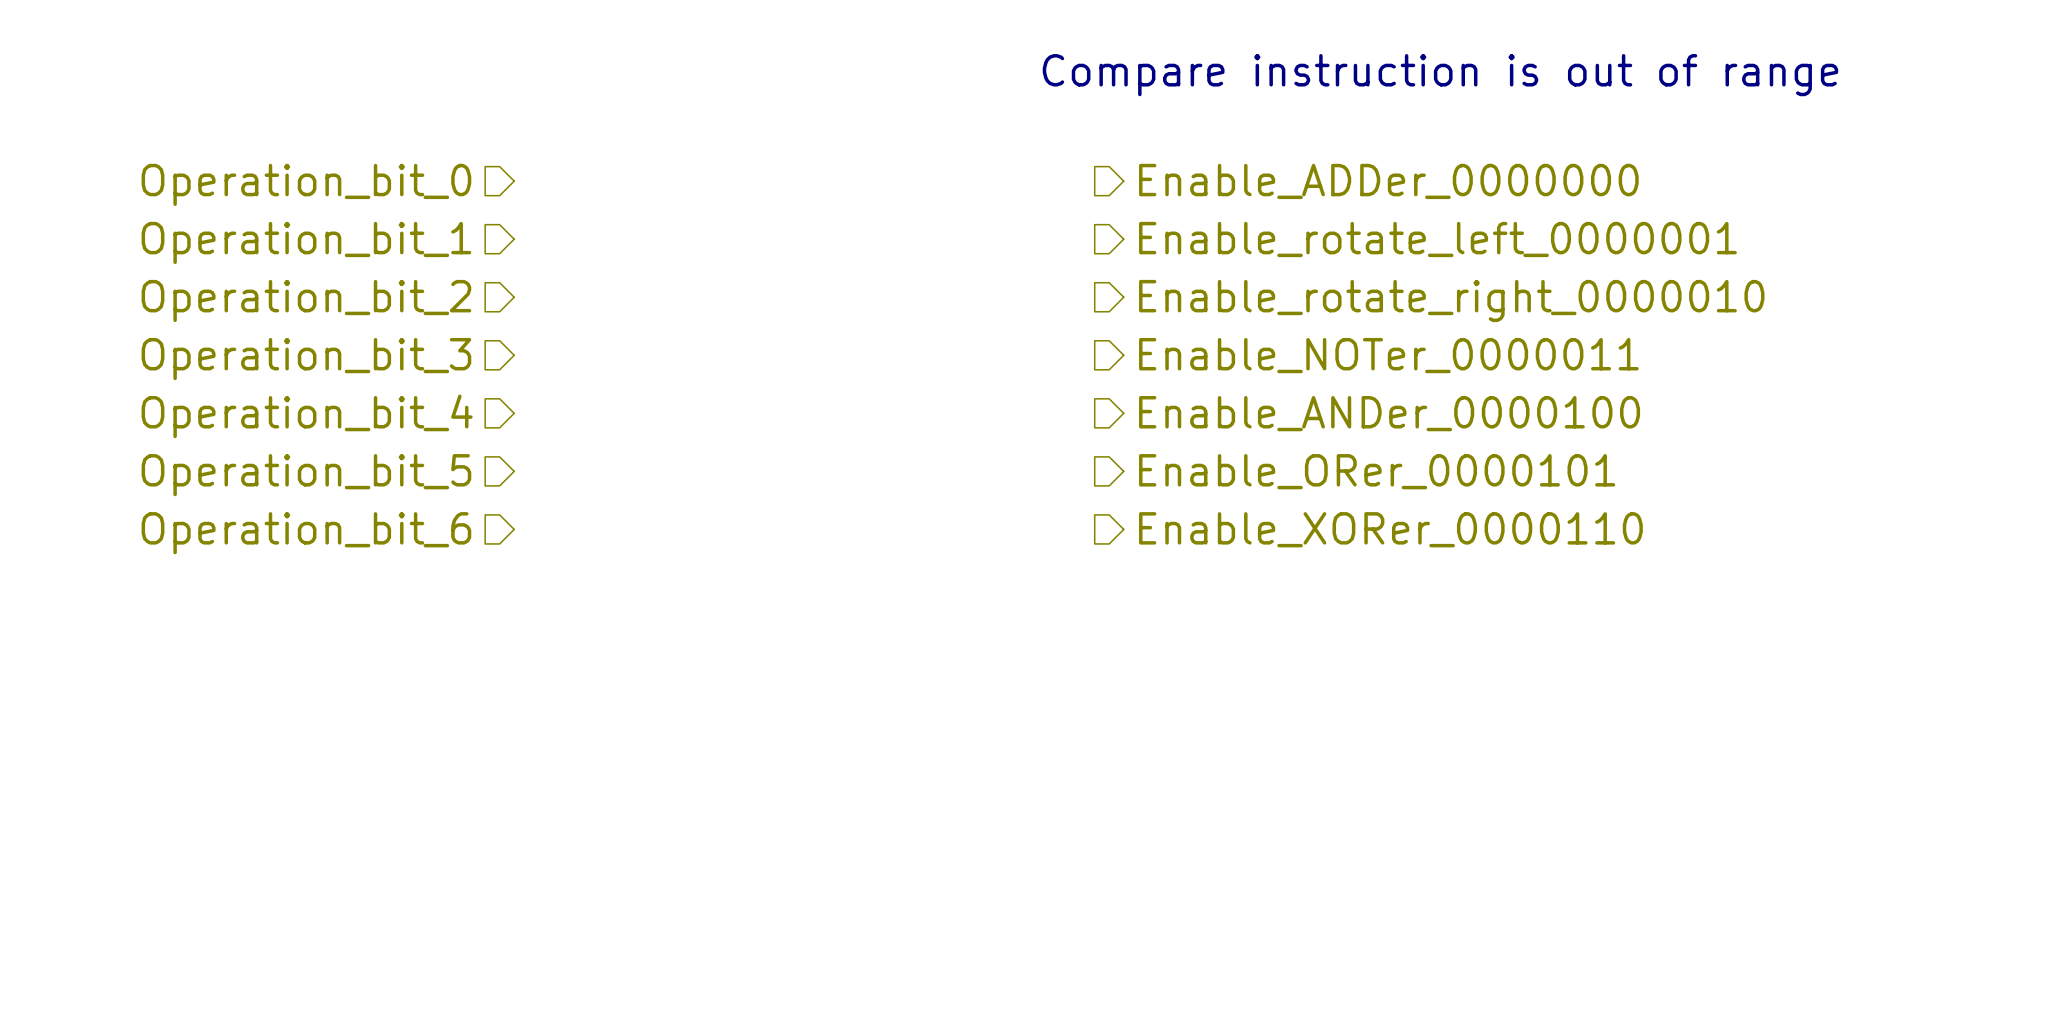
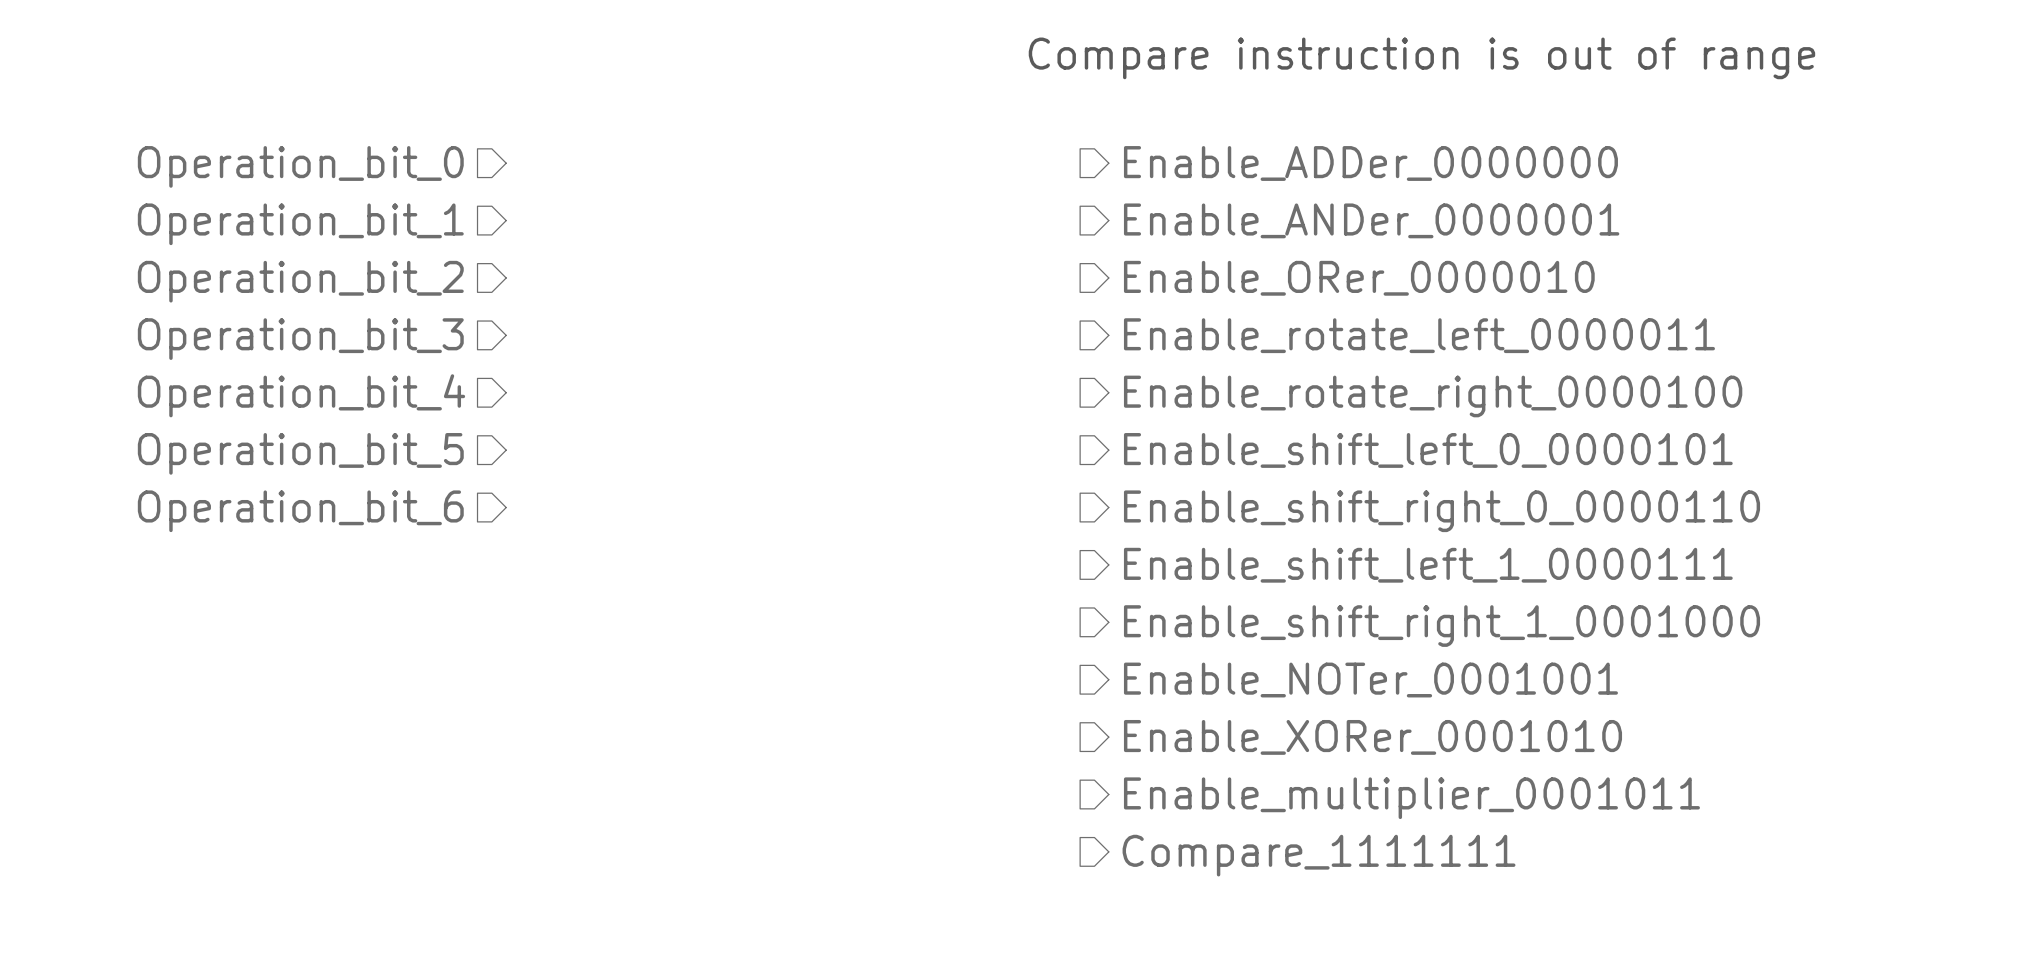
hierarchical label: Enable_rotate_left_0000001 (1437, 239) -> Enable_ANDer_0000001 (1371, 220)
hierarchical label: Enable_rotate_right_0000010 (1451, 300) -> Enable_ORer_0000010 (1359, 278)
hierarchical label: Enable_NOTer_0000011 (1388, 355) -> Enable_rotate_left_0000011 (1419, 335)
hierarchical label: Enable_ANDer_0000100 (1389, 413) -> Enable_rotate_right_0000100 (1433, 396)
hierarchical label: Enable_ORer_0000101 (1377, 471) -> Enable_shift_left_0_0000101 (1428, 450)
hierarchical label: Enable_XORer_0000110 (1390, 529) -> Enable_shift_right_0_0000110 (1442, 511)
hierarchical label: none -> Enable_shift_left_1_0000111 (1428, 565)
hierarchical label: none -> Enable_shift_right_1_0001000 (1442, 626)
hierarchical label: none -> Enable_NOTer_0001001 (1370, 680)
hierarchical label: none -> Enable_XORer_0001010 (1372, 737)
hierarchical label: none -> Enable_multiplier_0001011 (1411, 798)
hierarchical label: none -> Compare_1111111 (1319, 855)

